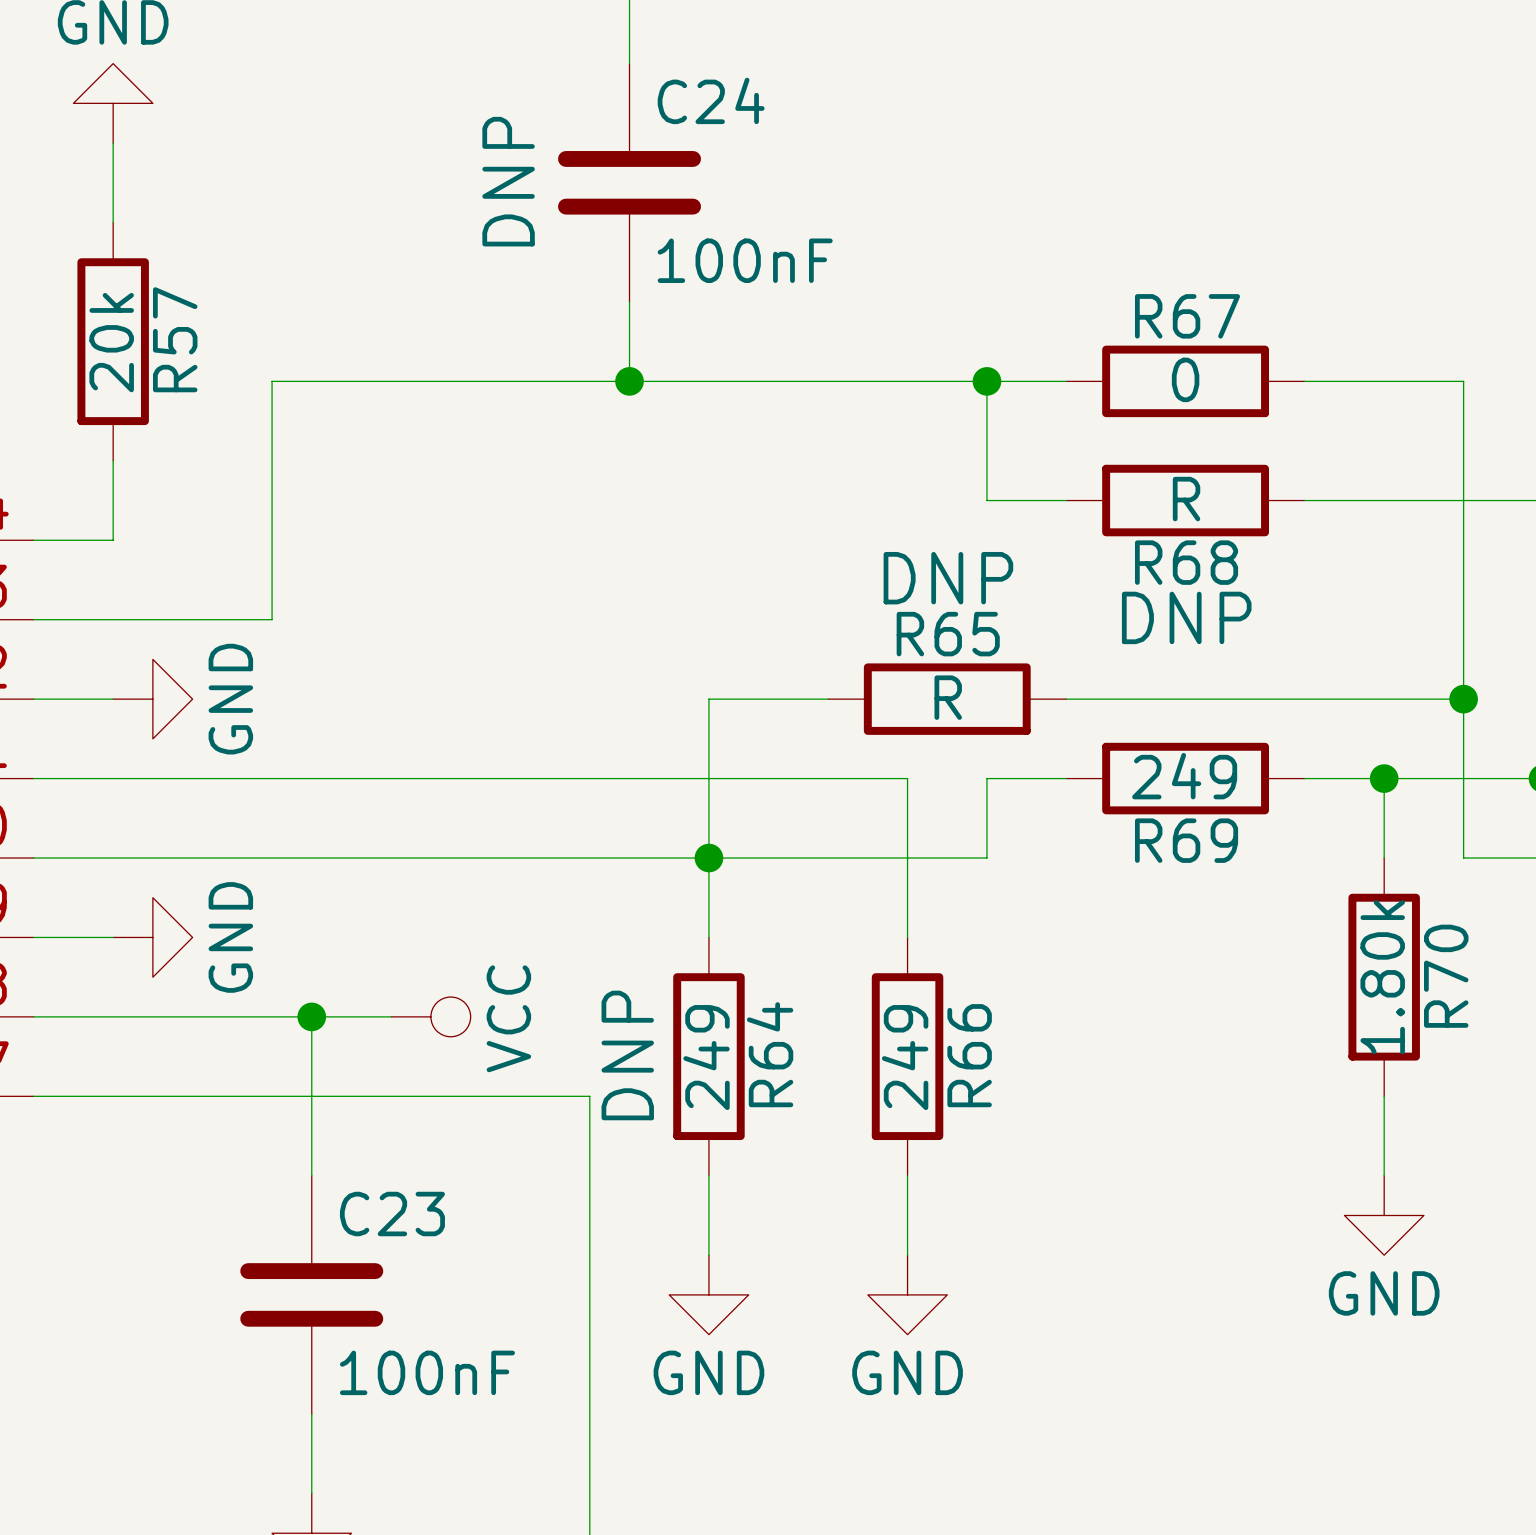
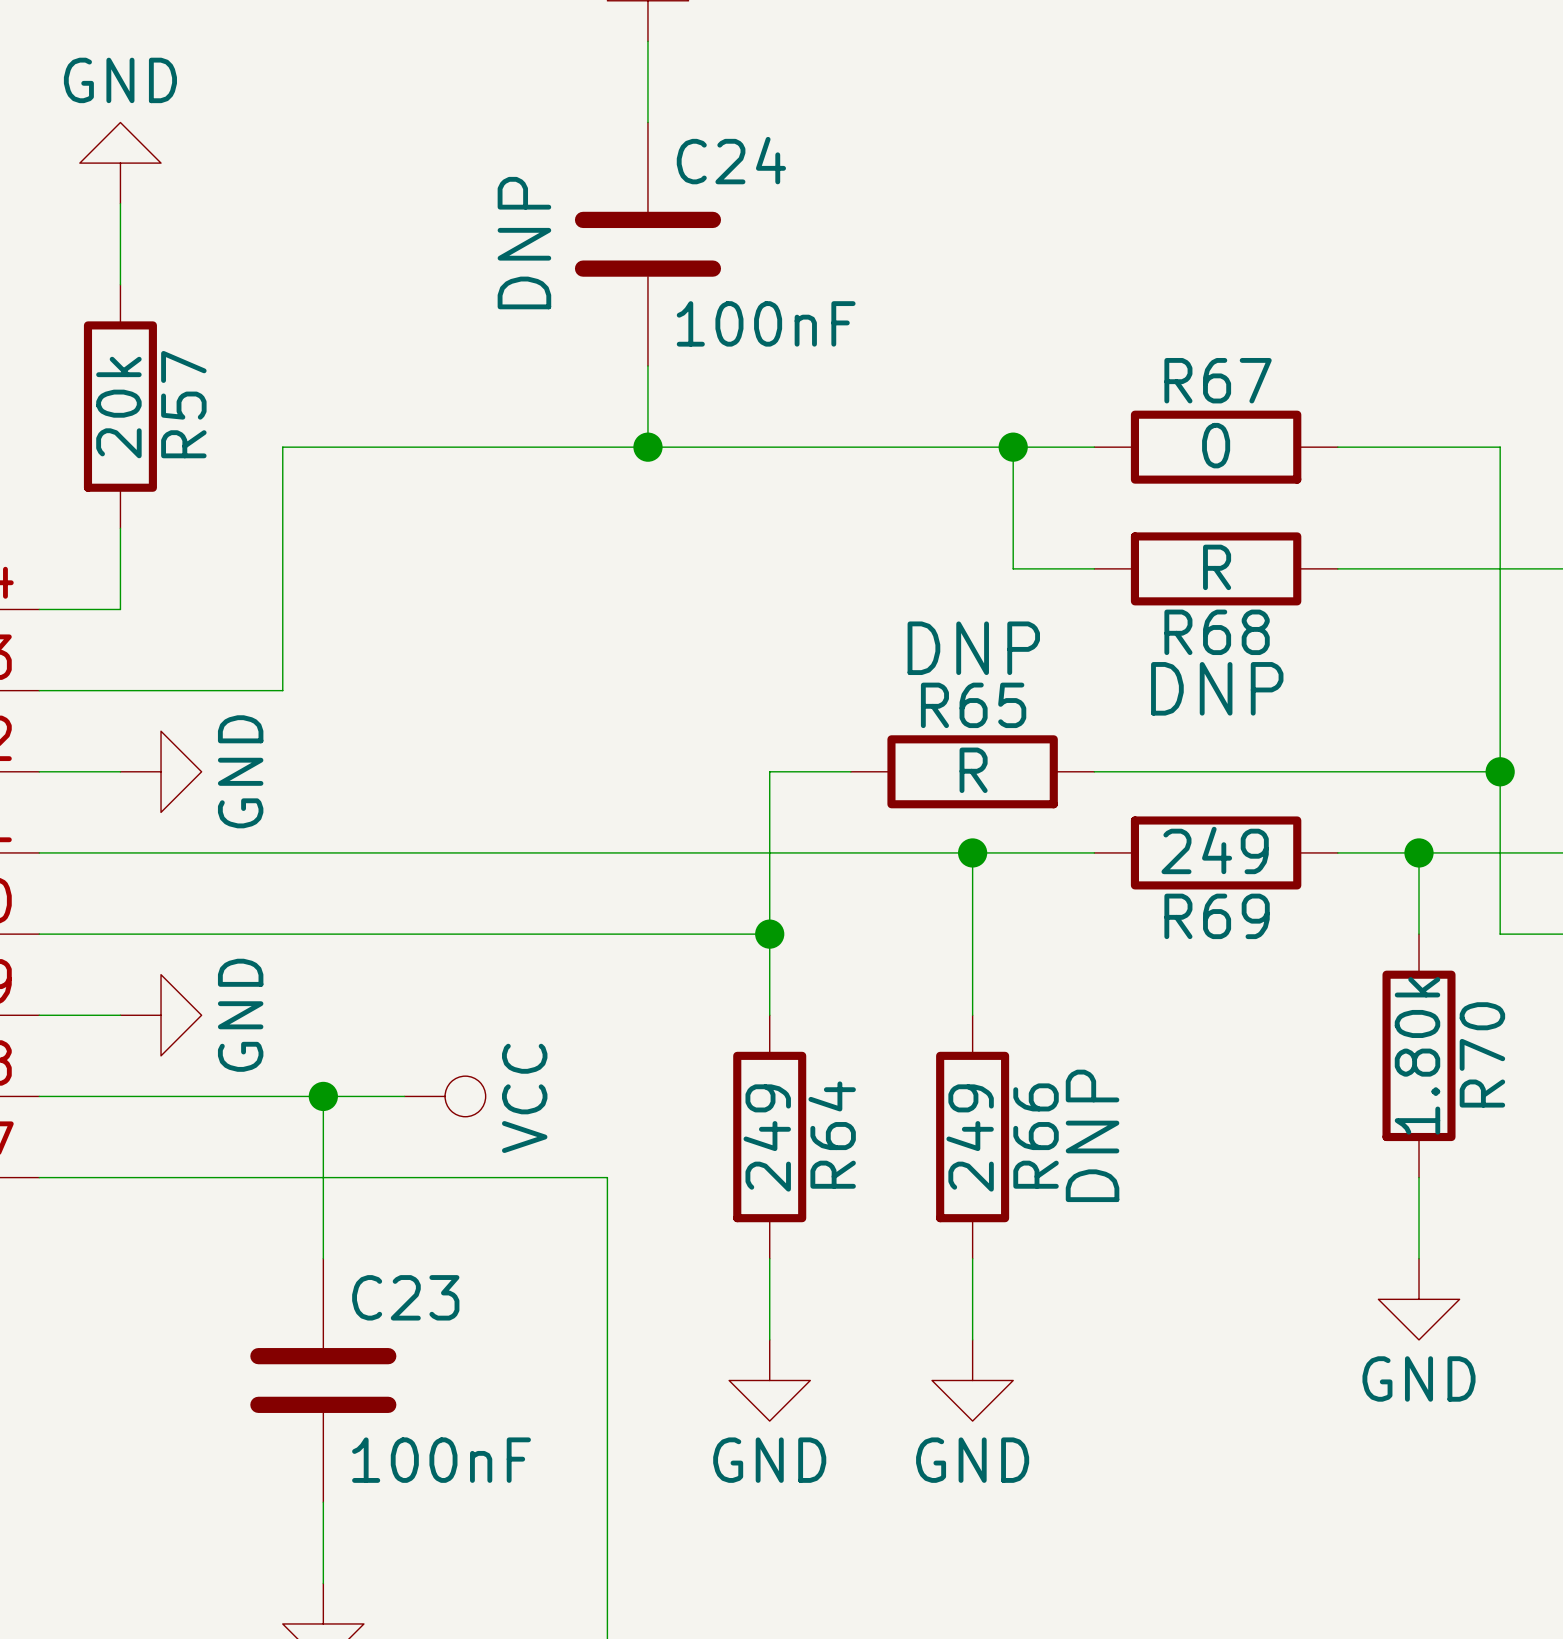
wire: (748, 699) (708, 699) (708, 937) -> (769, 771) (769, 1015)
wire: (907, 778) (907, 937) -> (932, 852) (1013, 852)
wire: none -> (972, 852) (972, 1015)
junction: none -> (972, 852)
wire: (986, 778) (986, 858) (748, 858) -> none
junction position: (708, 858) -> (769, 934)
R64 text: DNP (627, 1055) -> none
R66 text: none -> DNP (1092, 1135)
R64 position: (708, 1056) -> (769, 1137)
R66 position: (907, 1056) -> (972, 1137)
wire: (708, 1175) (708, 1255) -> (769, 1258) (769, 1339)
wire: (907, 1175) (907, 1255) -> (972, 1258) (972, 1339)
power symbol position: GND (708, 1294) -> GND (769, 1380)
power symbol position: GND (907, 1294) -> GND (972, 1380)

